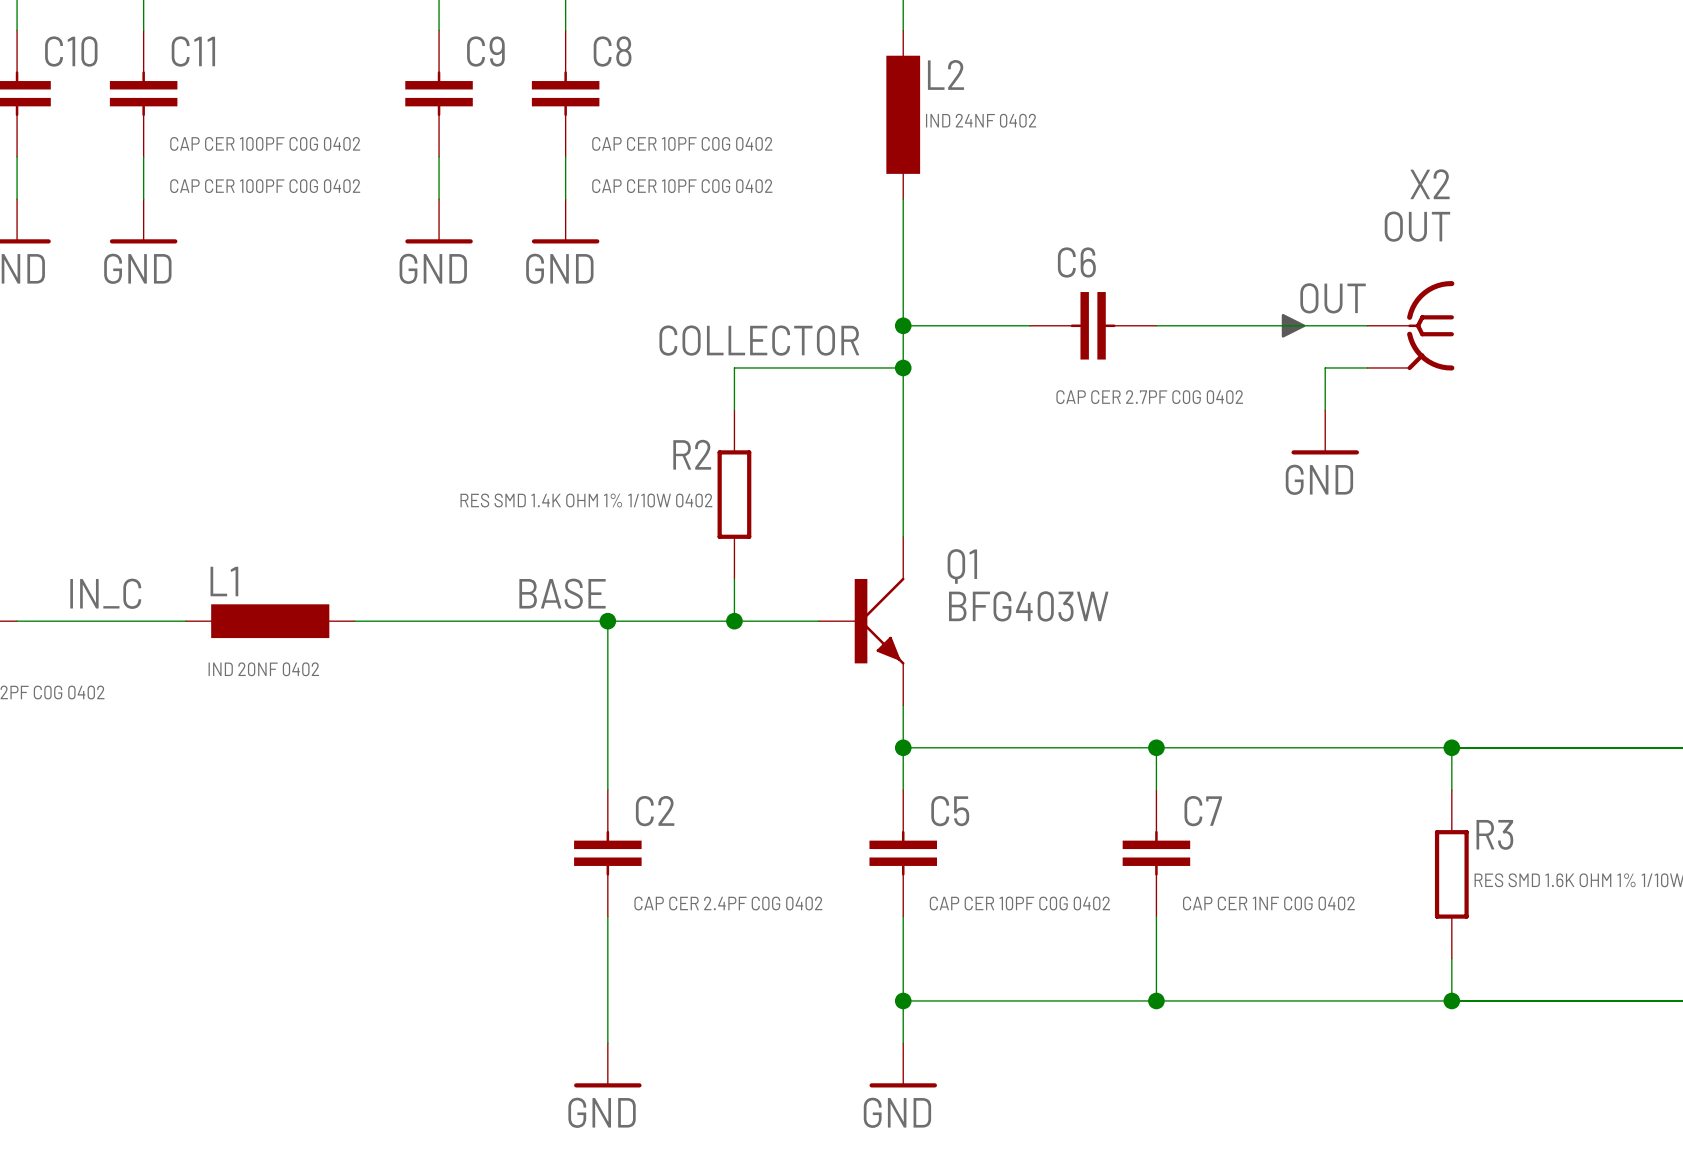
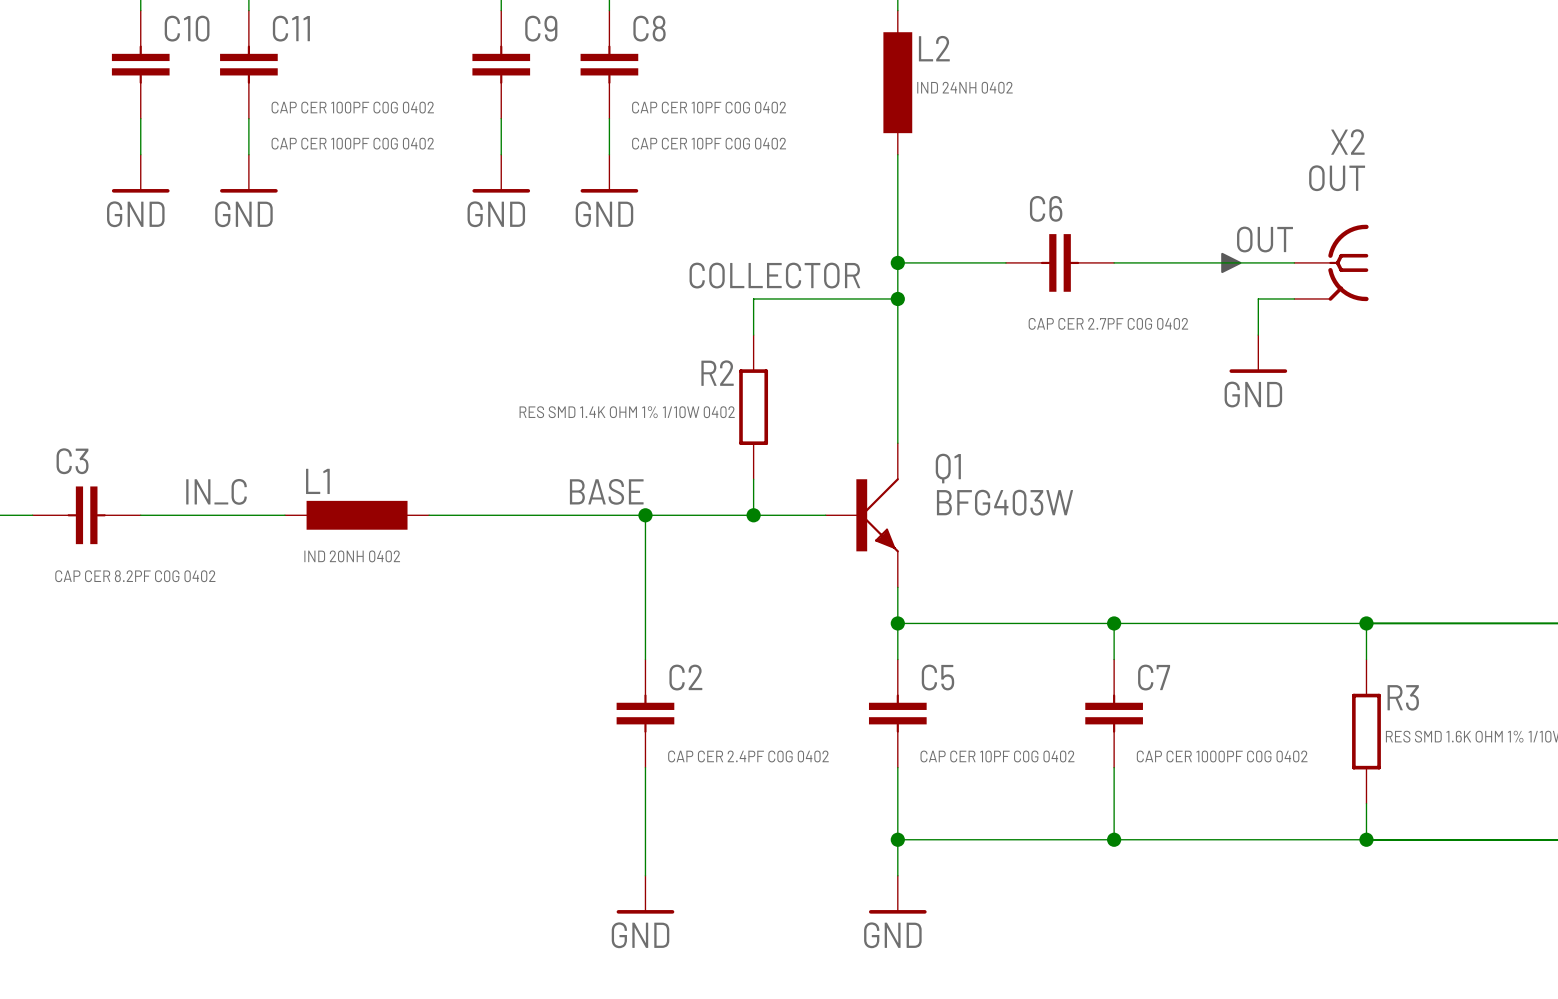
L2 value: IND 24NF 0402 (981, 120) -> IND 24NH 0402 (964, 87)
L1 value: IND 20NF 0402 (263, 669) -> IND 20NH 0402 (352, 556)
C7 value: CAP CER 1NF C0G 0402 (1268, 903) -> CAP CER 1000PF C0G 0402 (1222, 756)

